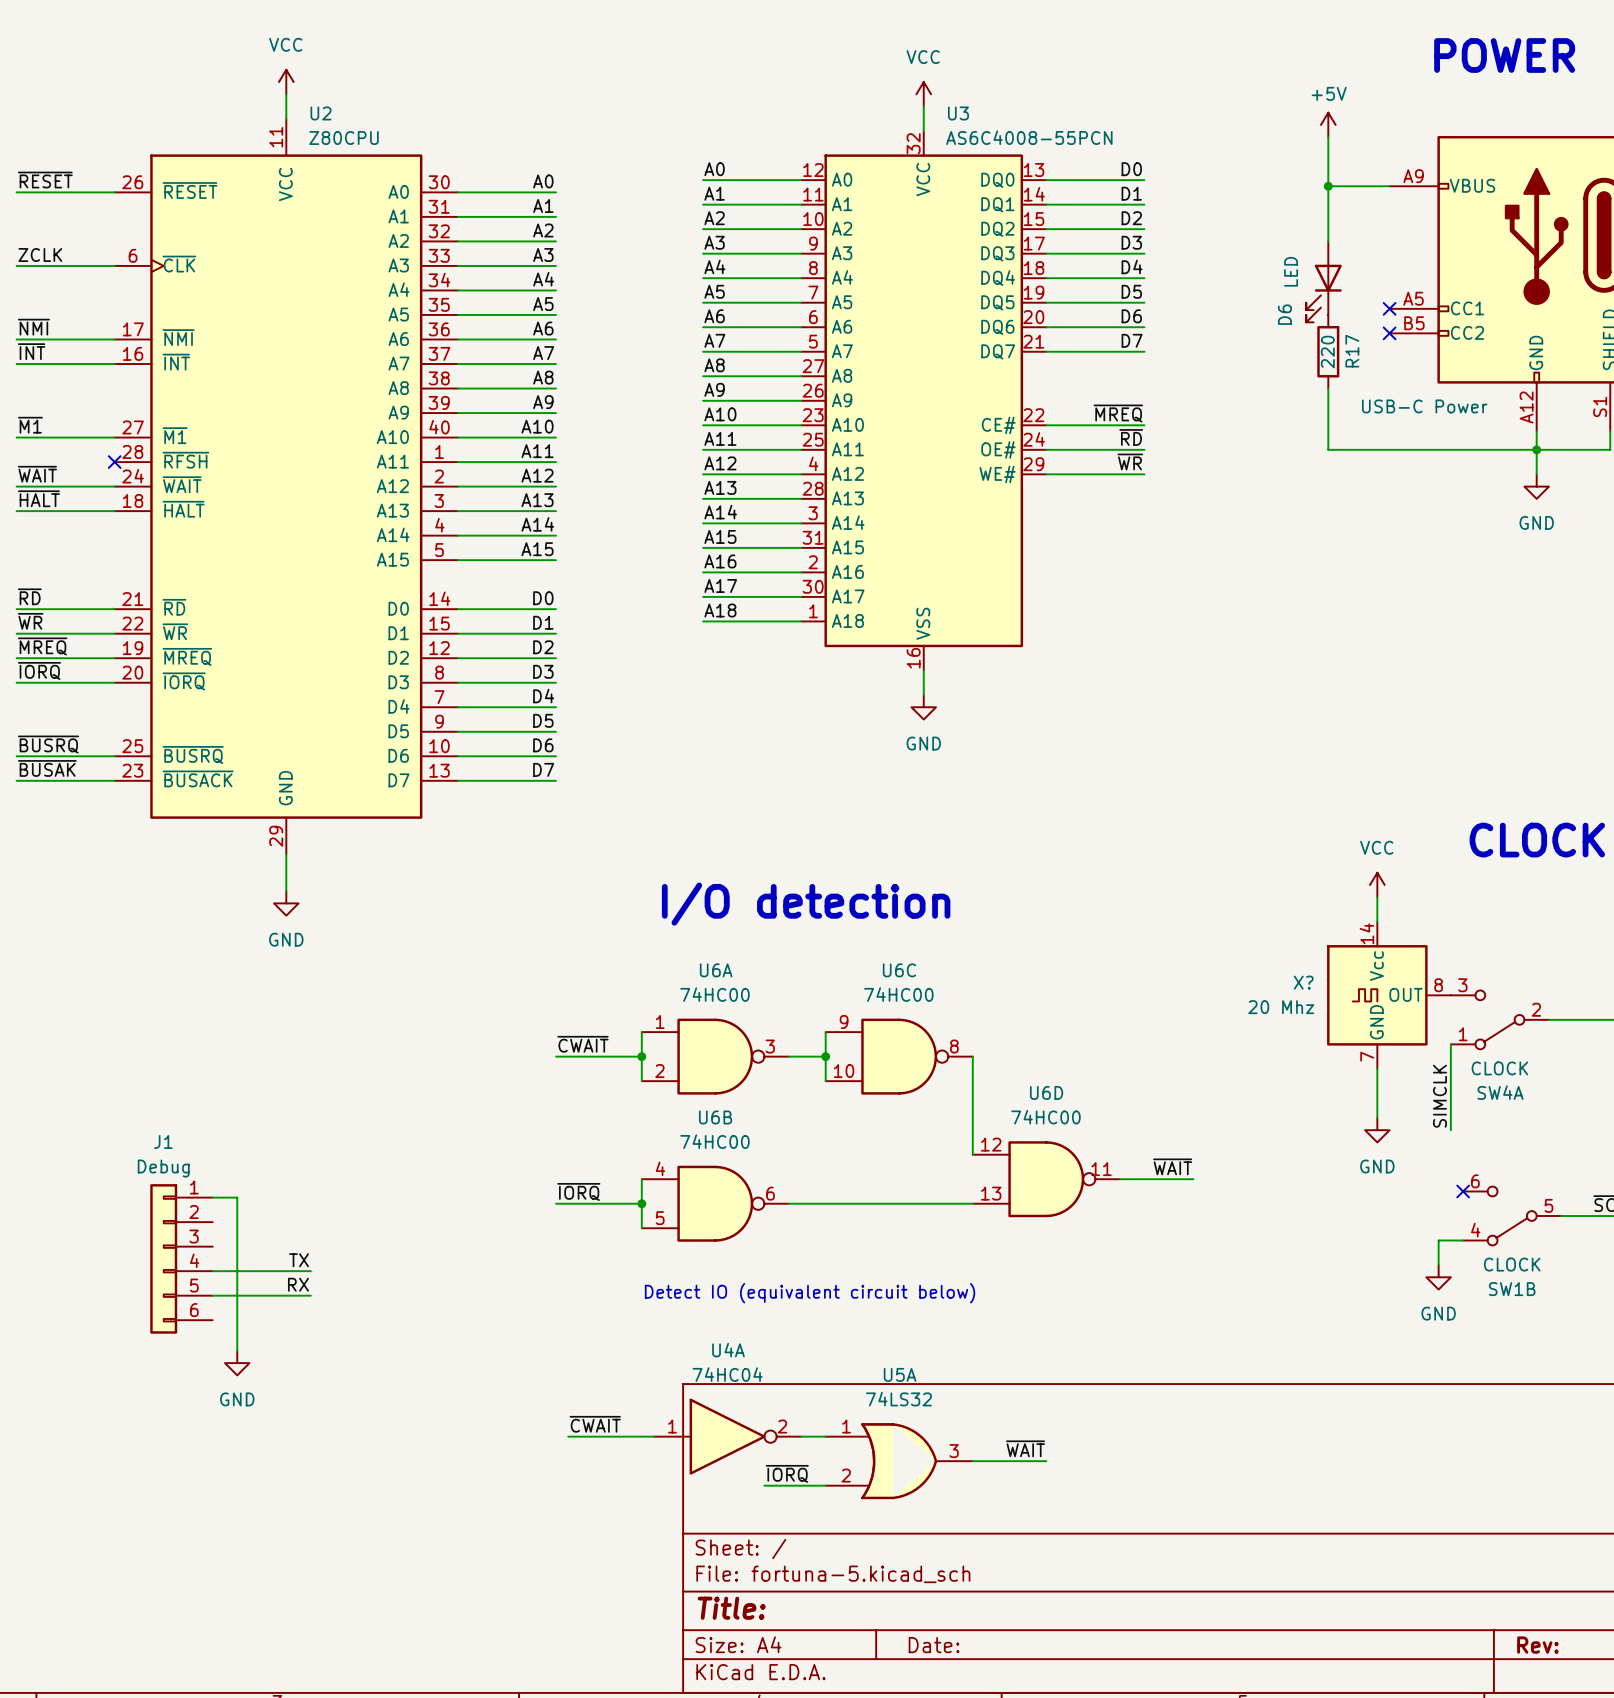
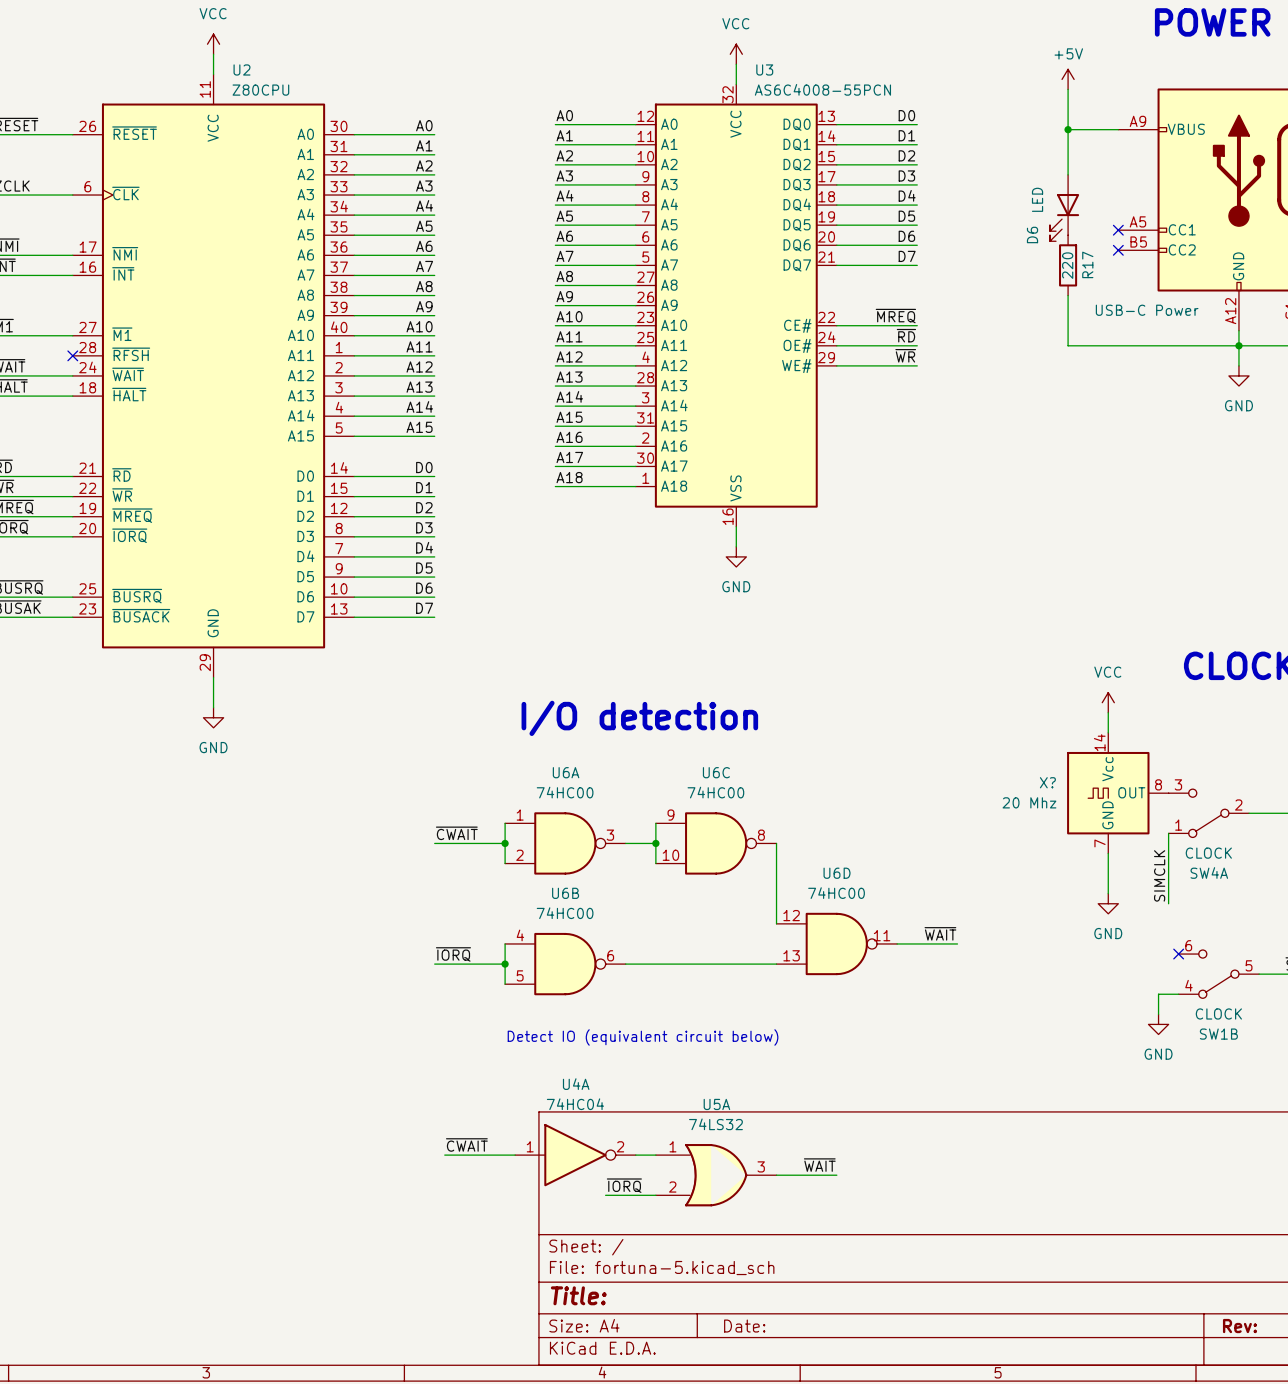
wire: (212, 1197) (237, 1197) (237, 1350) -> none
J1: Debug (181, 1258) -> none
label: TX (299, 1260) -> none
wire: (212, 1271) (310, 1271) -> none
label: RX (298, 1284) -> none
wire: (212, 1295) (310, 1295) -> none
power symbol: GND (237, 1363) -> none

